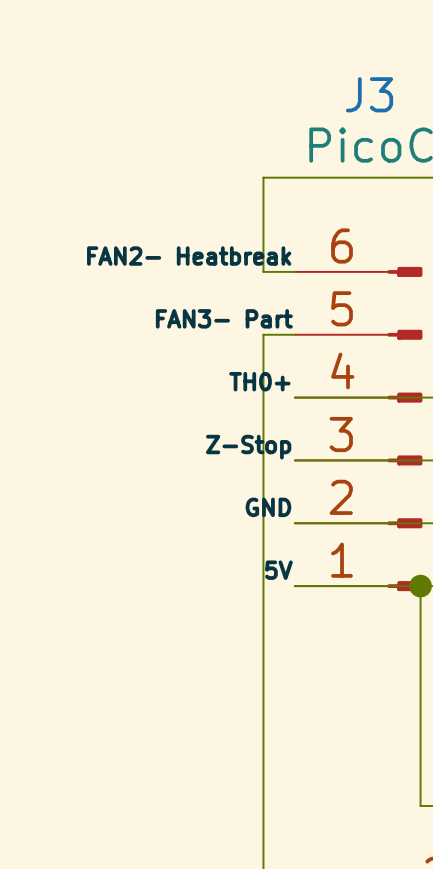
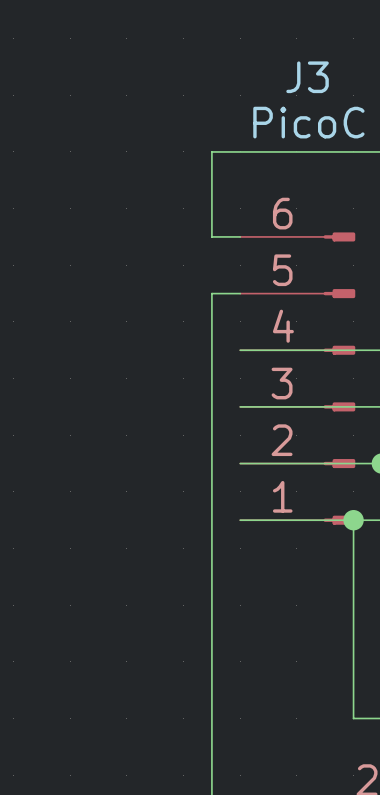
label: FAN2- Heatbreak (189, 256) -> none
label: FAN3- Part (224, 318) -> none
label: TH0+ (259, 381) -> none
label: Z-Stop (248, 447) -> none
label: GND (268, 507) -> none
label: 5V (278, 570) -> none

